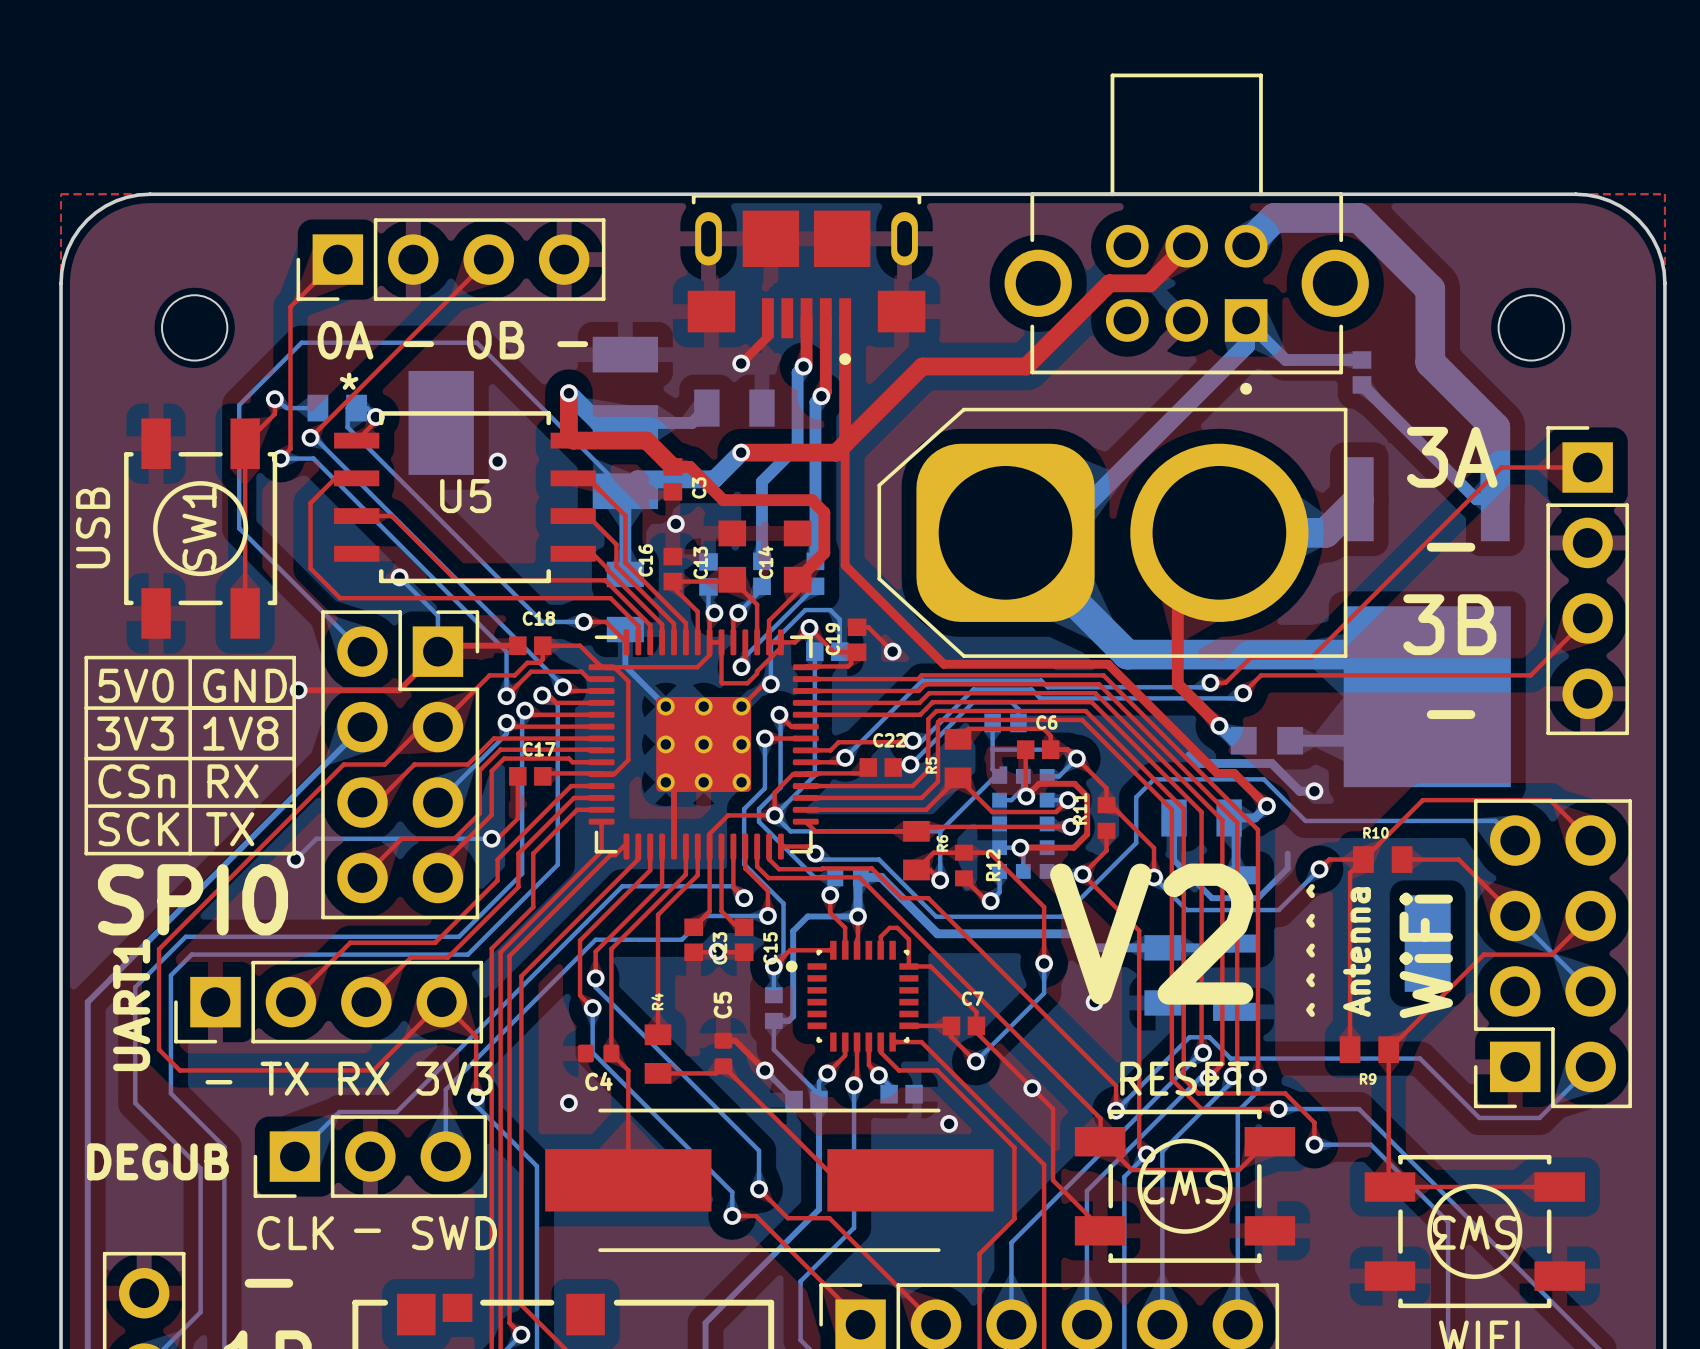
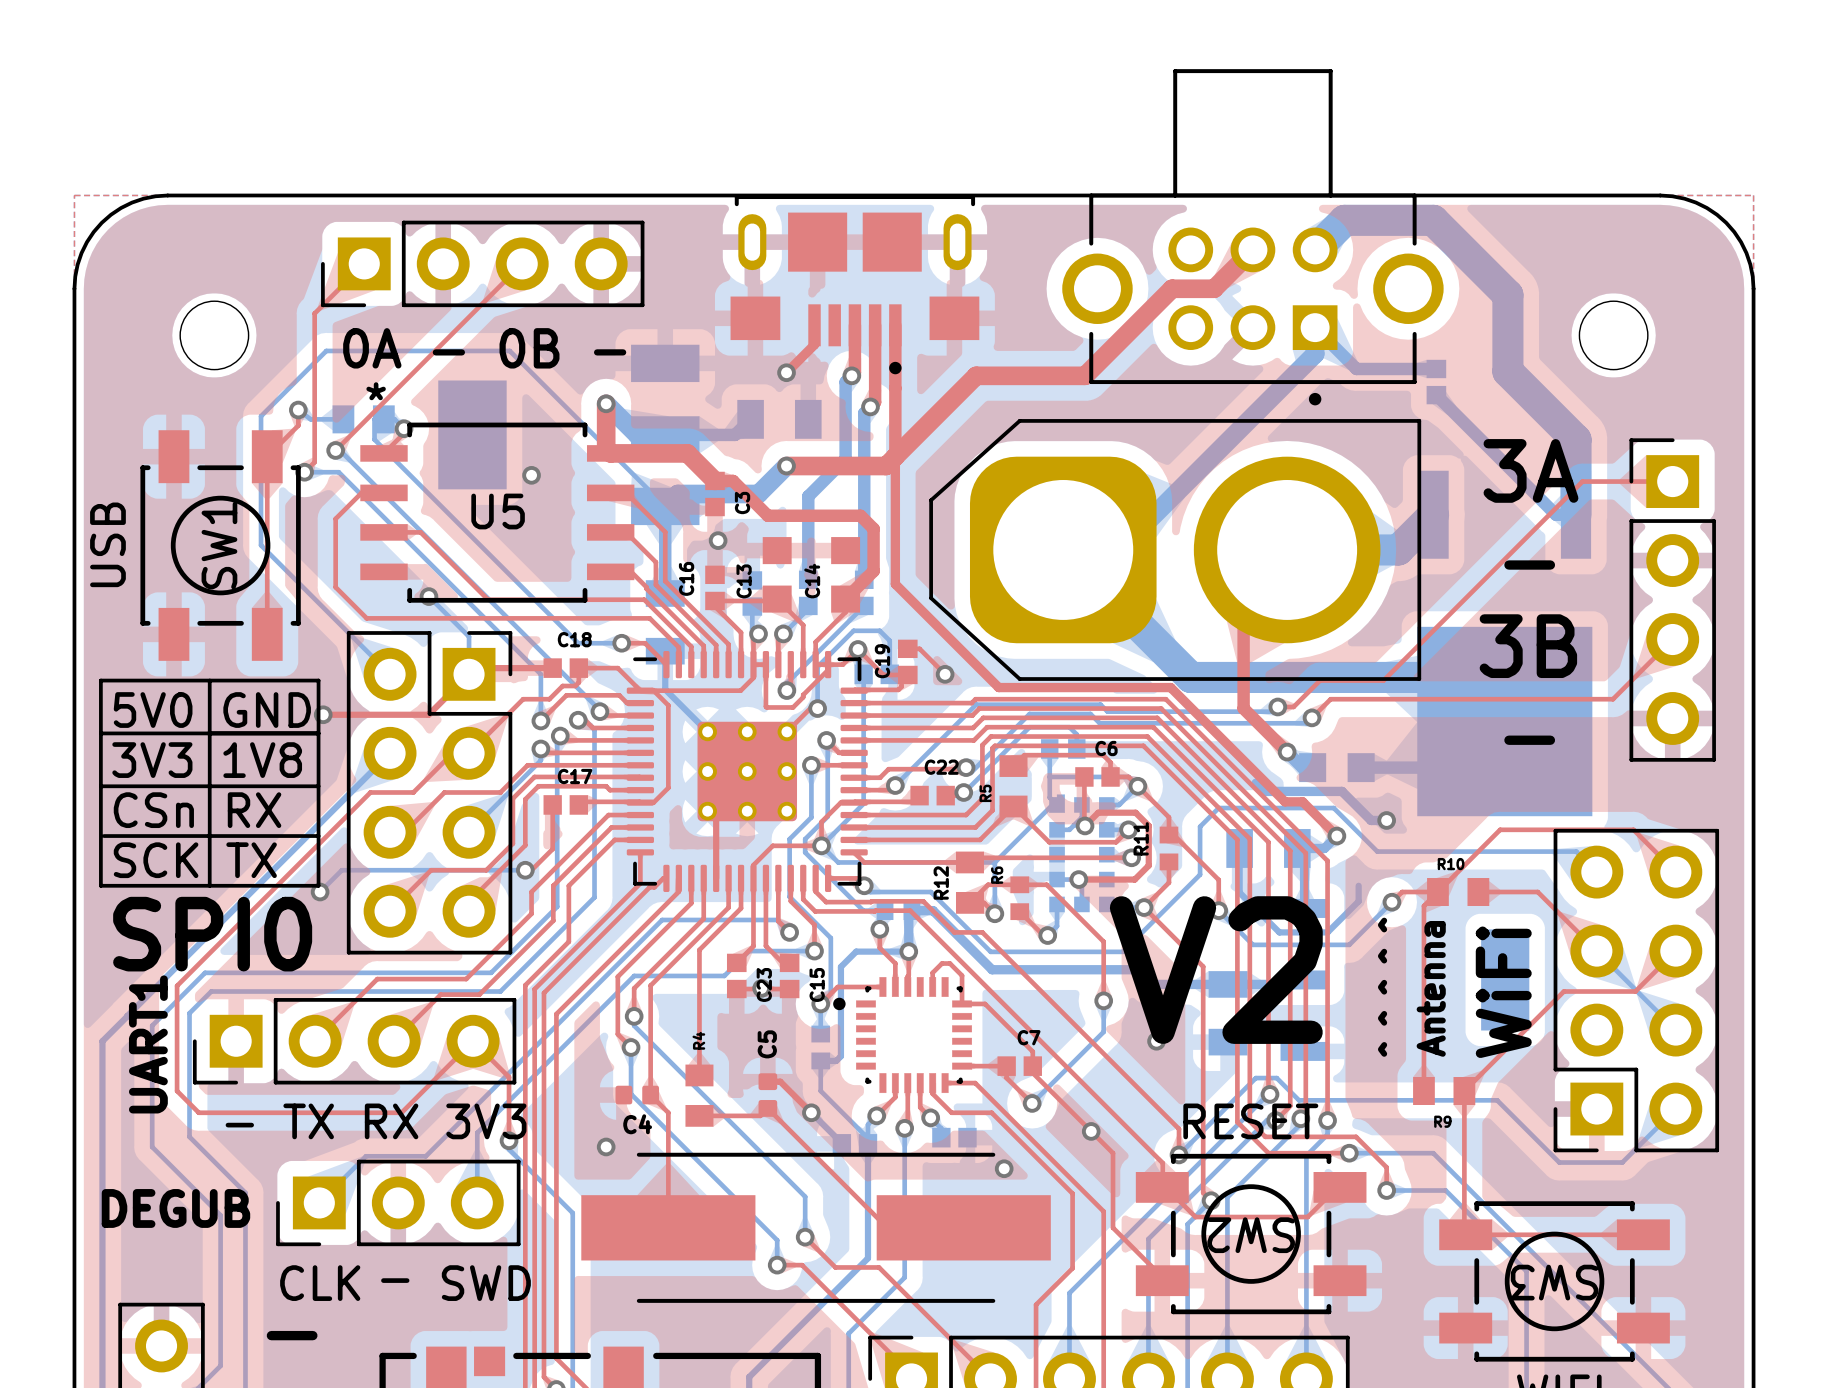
R12 name position: R12 (993, 865) -> R12 (941, 883)

